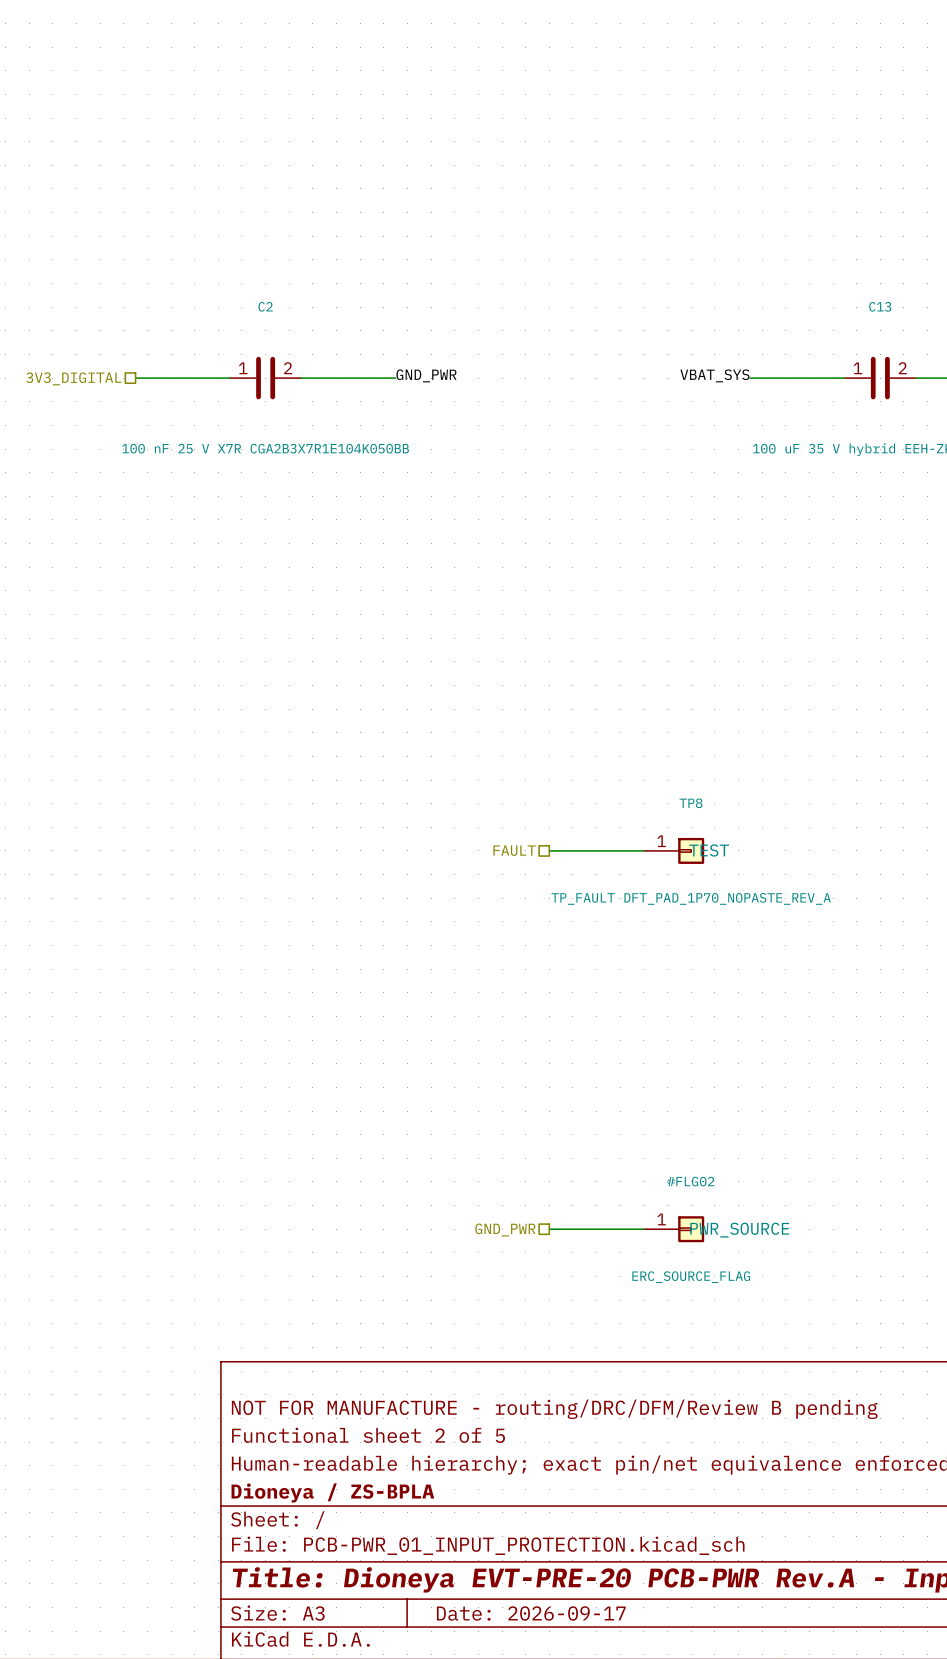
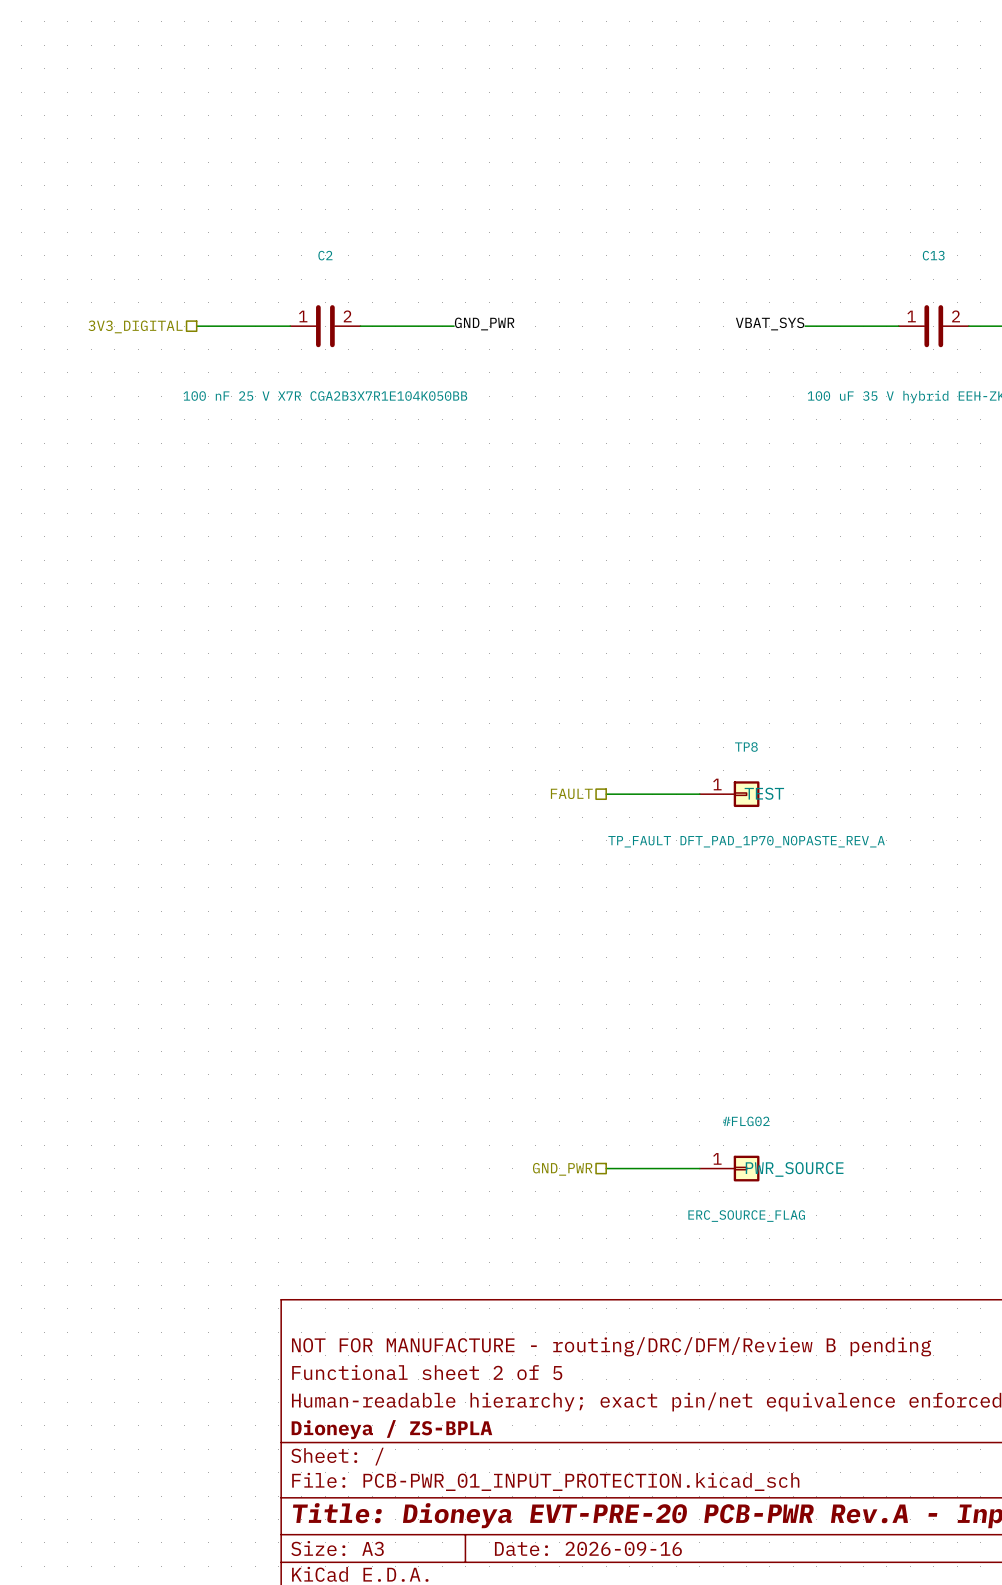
title block: Date: 2026-09-17 (531, 1613) -> Date: 2026-09-16 (588, 1548)

